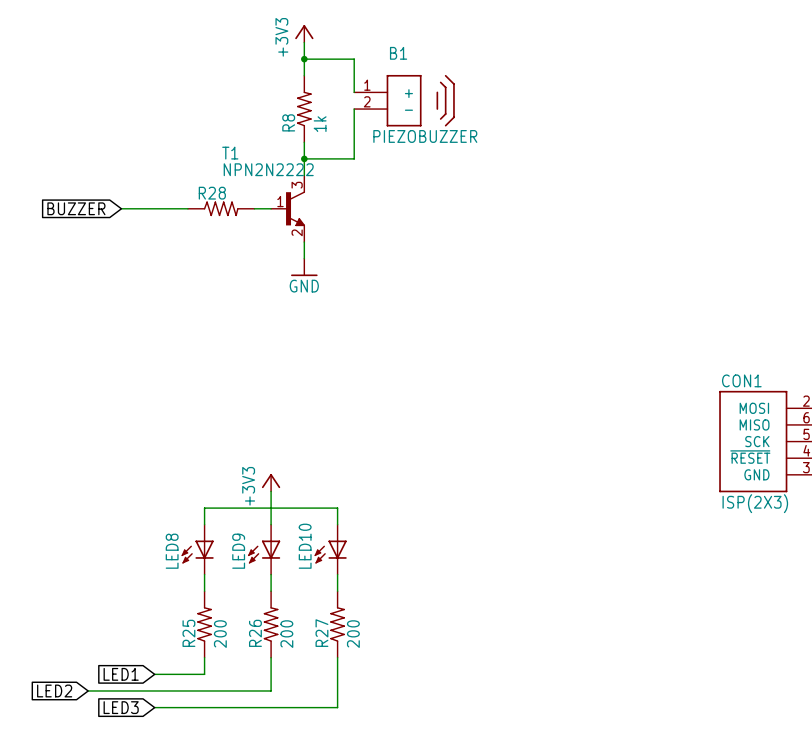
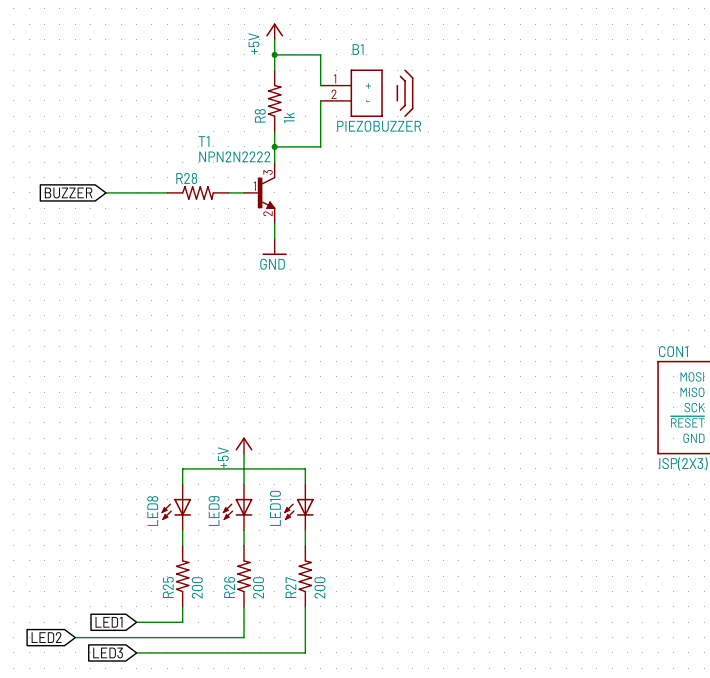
power symbol: +3V3 (304, 33) -> +5V (274, 31)
power symbol: +3V3 (271, 482) -> +5V (244, 445)

